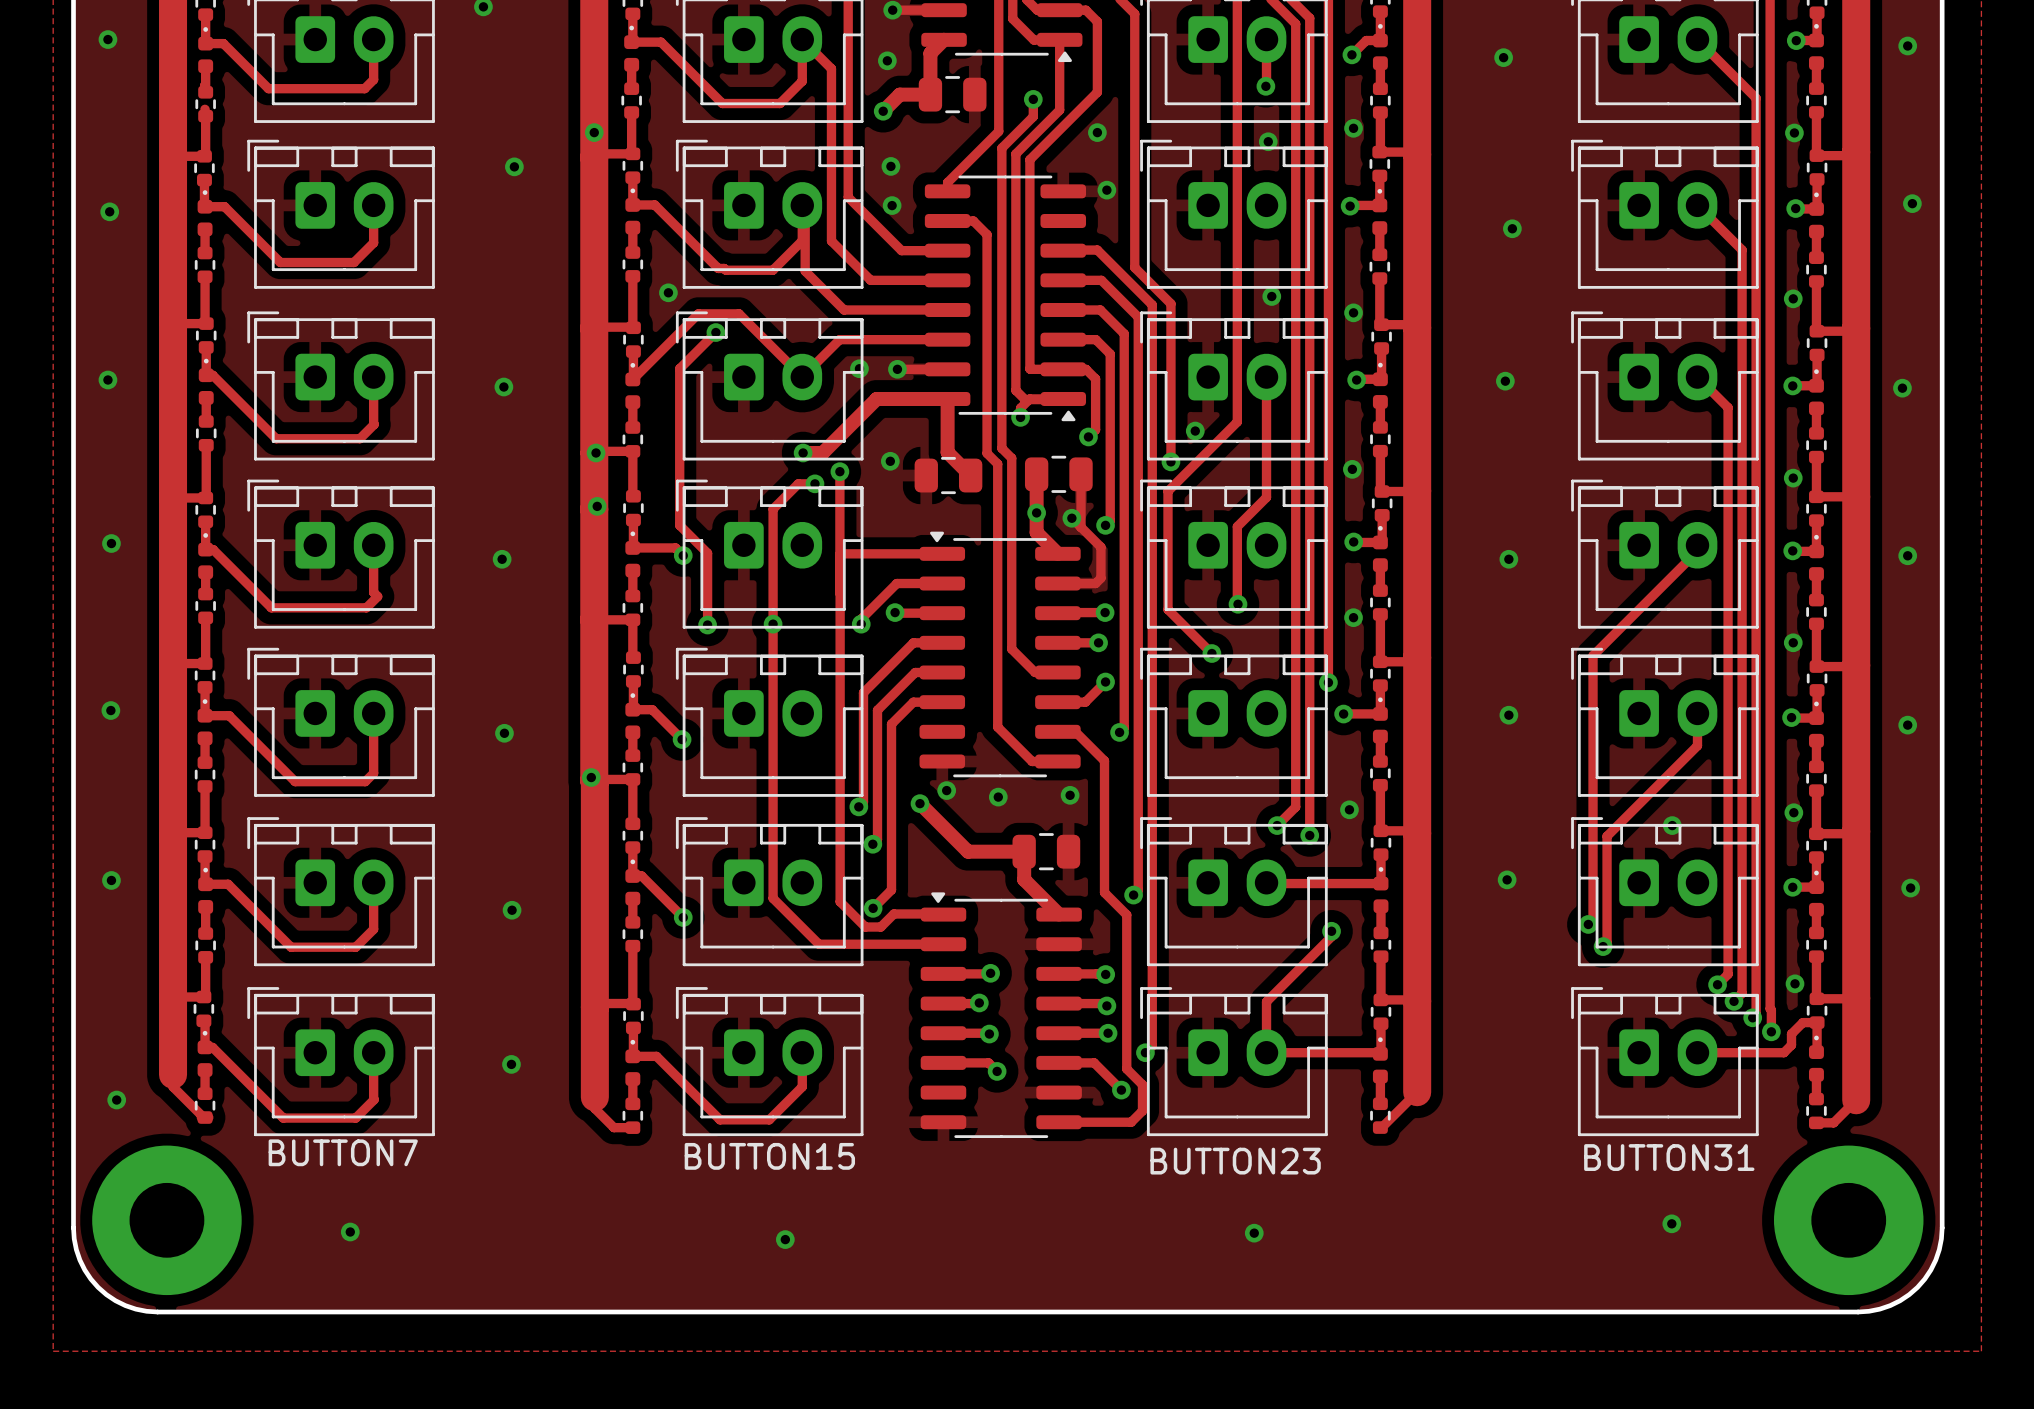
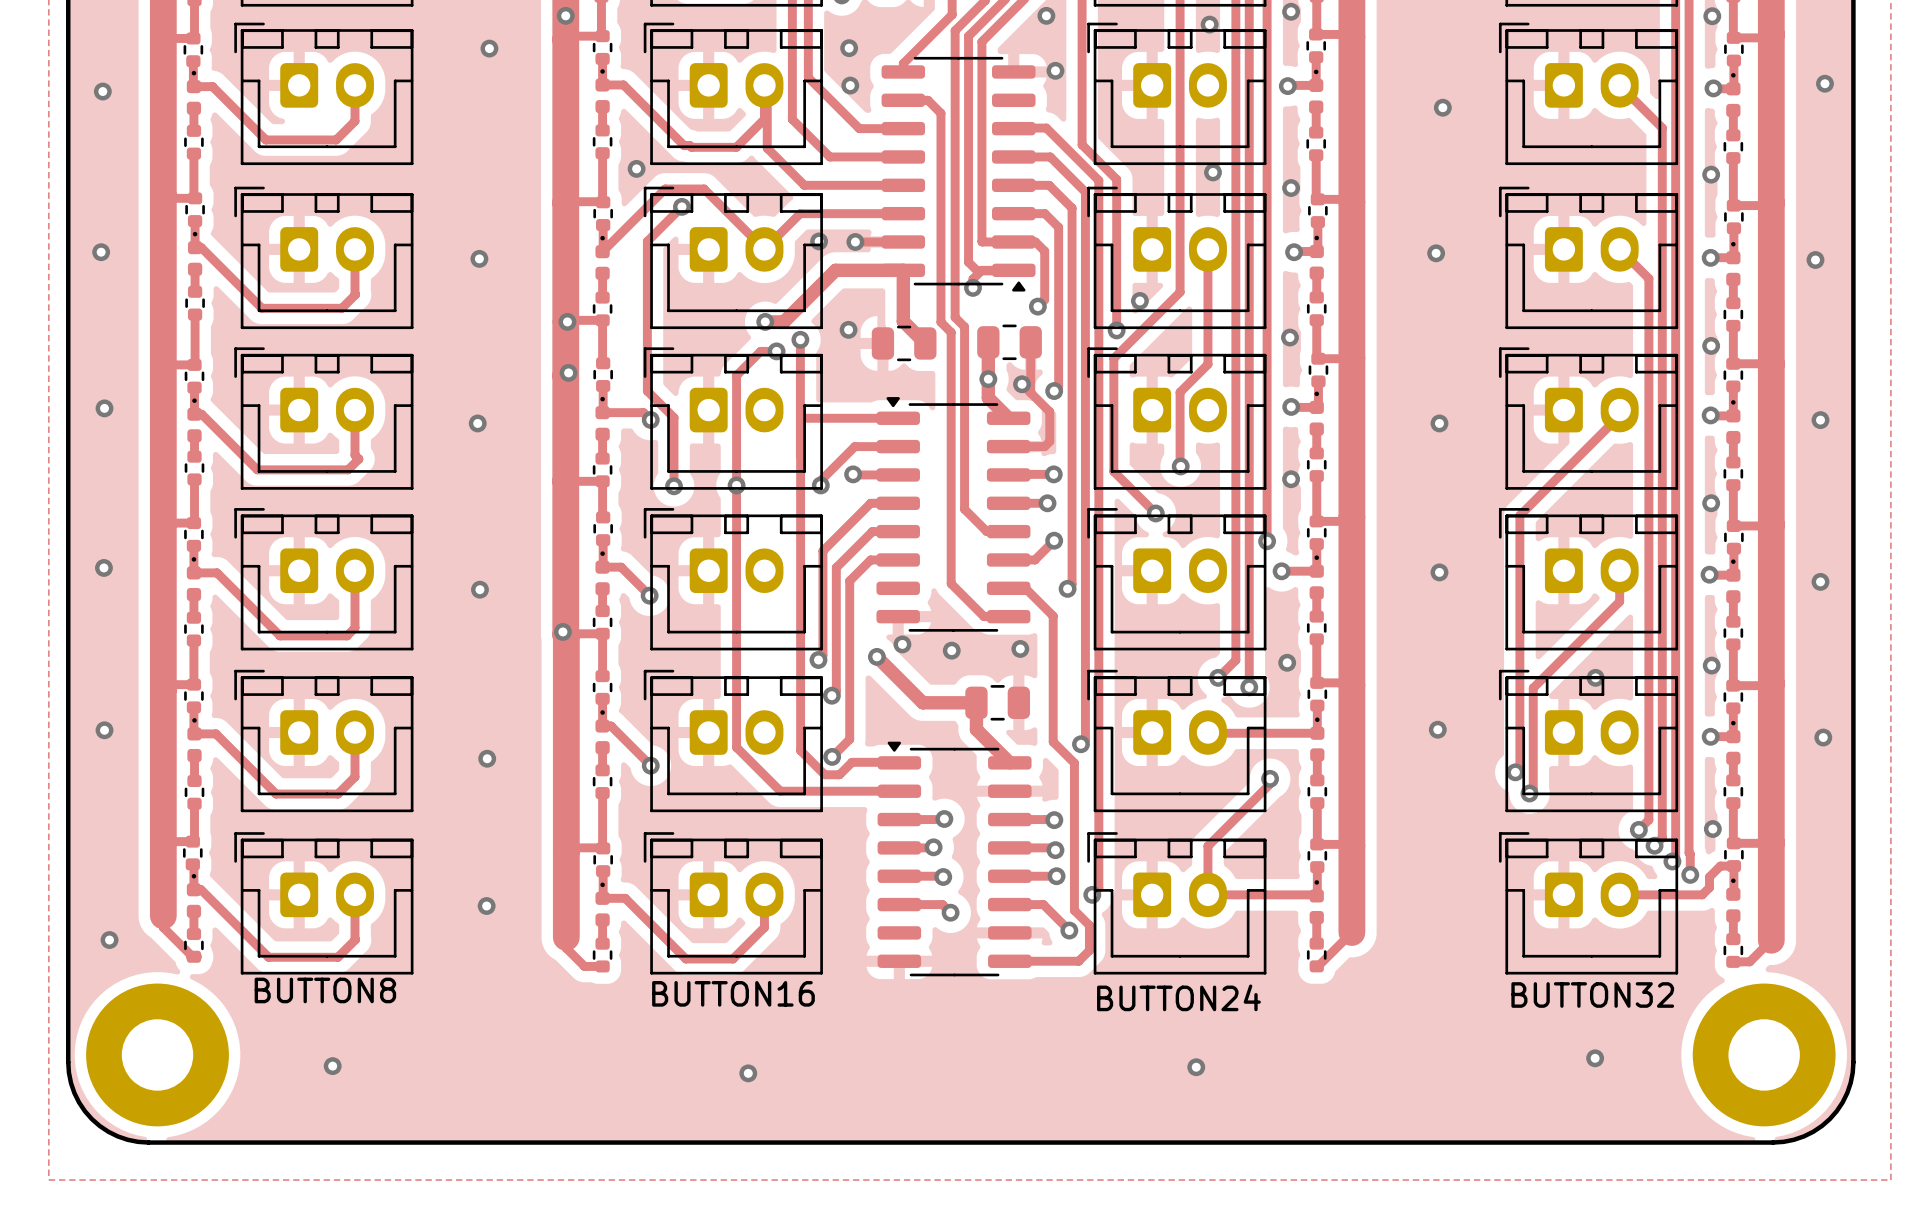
part value: BUTTON7 (343, 1152) -> BUTTON8 (325, 990)
part value: BUTTON15 (769, 1156) -> BUTTON16 (733, 993)
part value: BUTTON31 (1669, 1157) -> BUTTON32 (1592, 994)
part value: BUTTON23 (1235, 1161) -> BUTTON24 (1178, 997)

